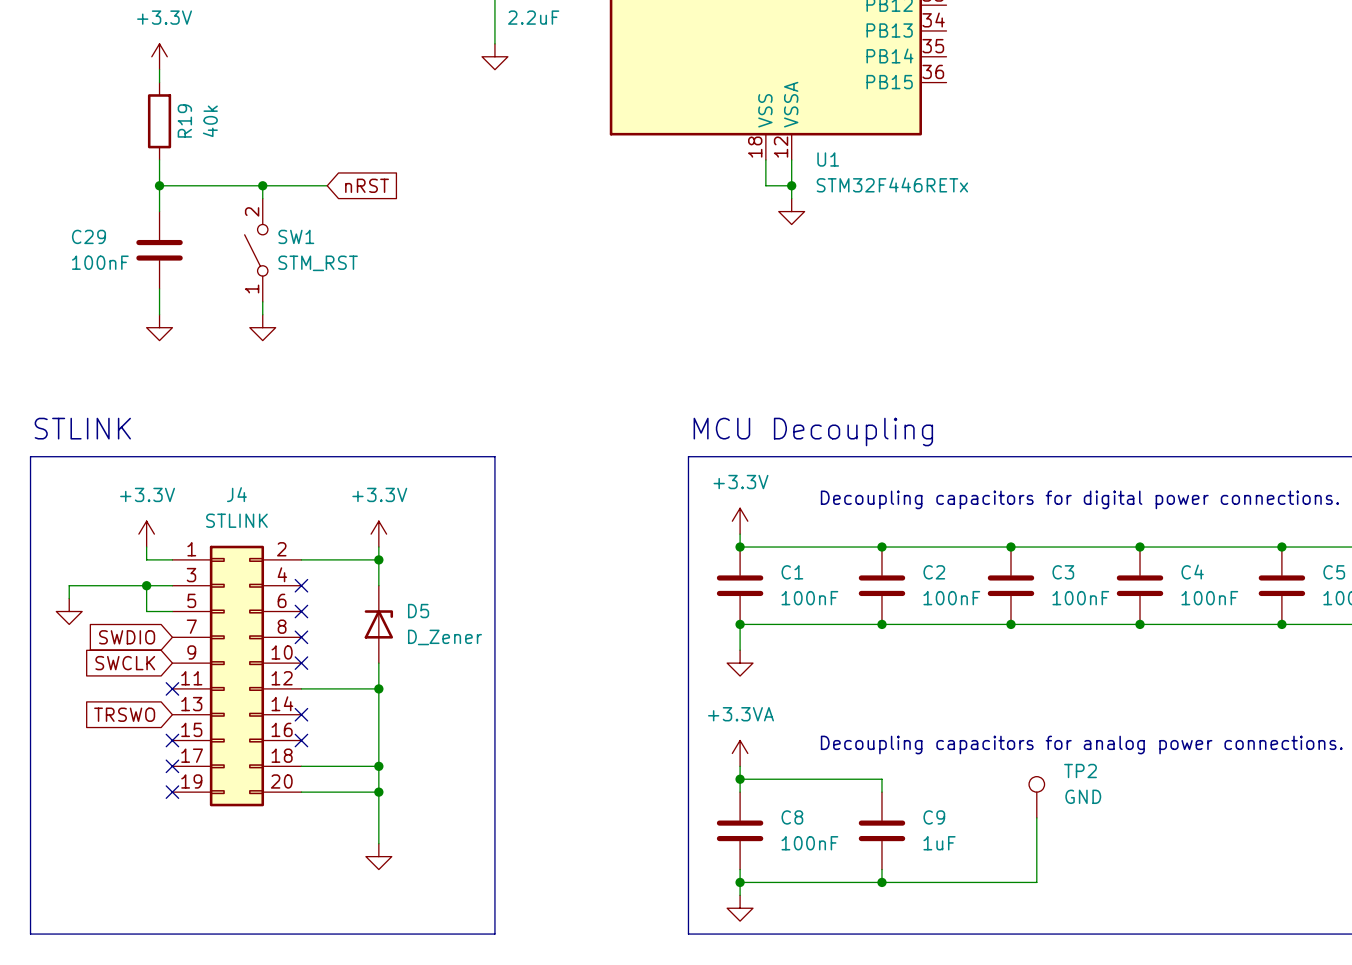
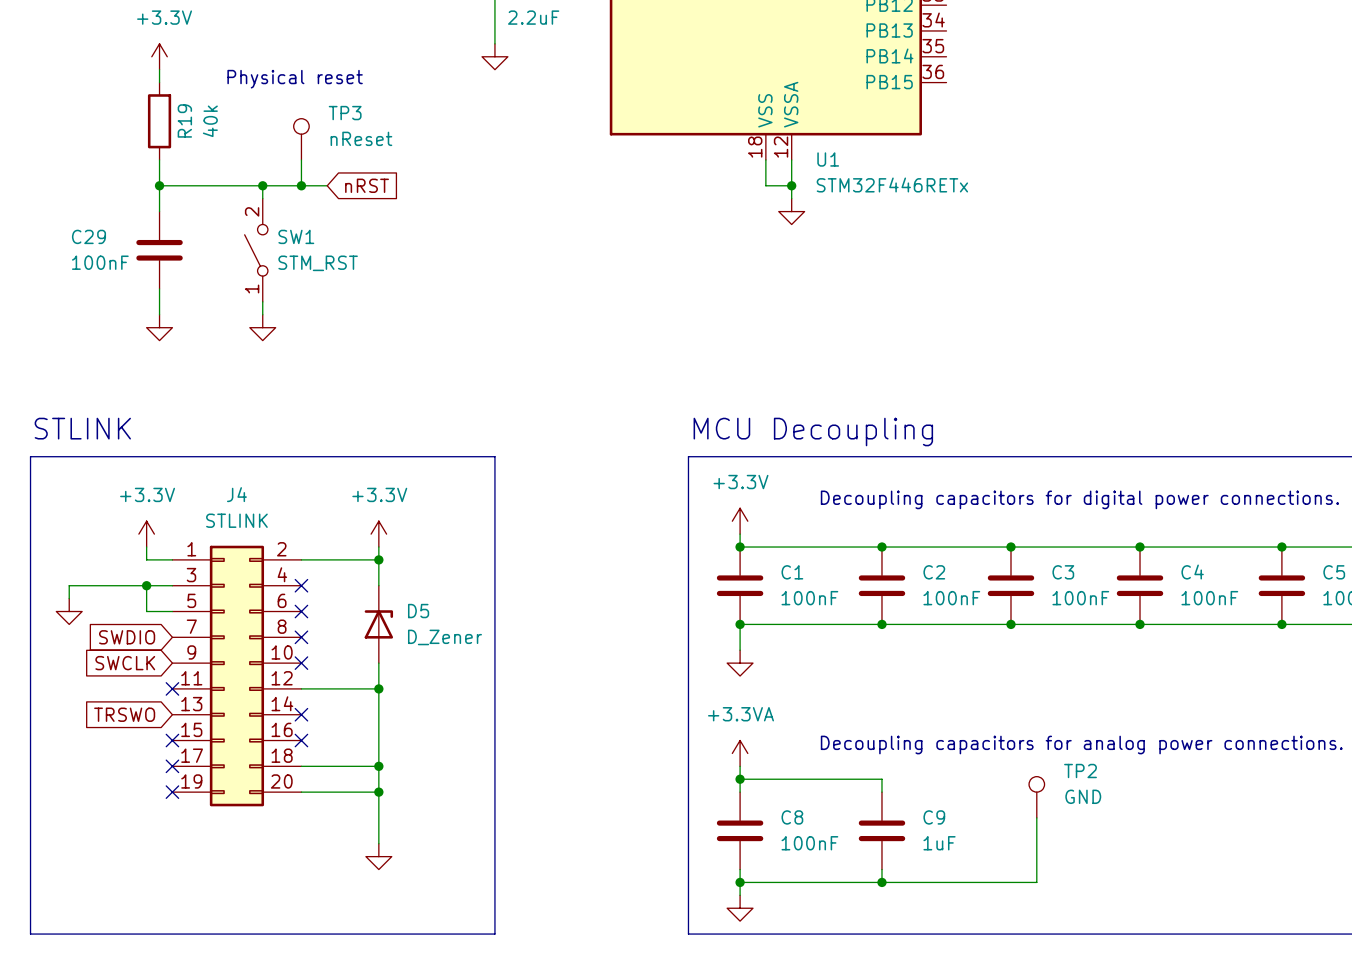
text: none -> Physical reset (295, 79)
TP3: none -> nReset (301, 139)
wire: none -> (301, 159) (301, 185)
junction: none -> (301, 185)

